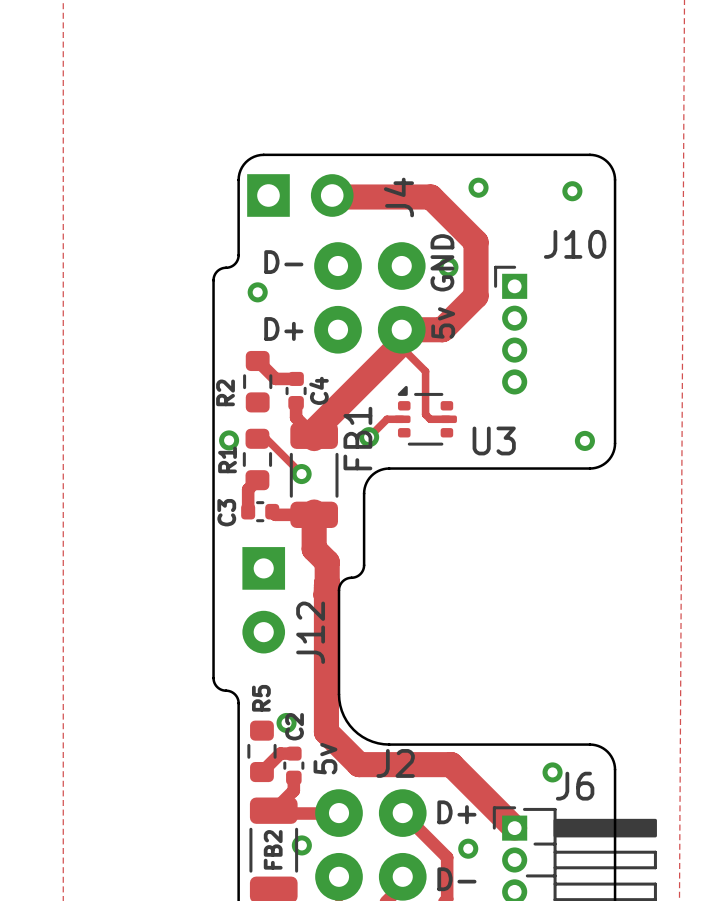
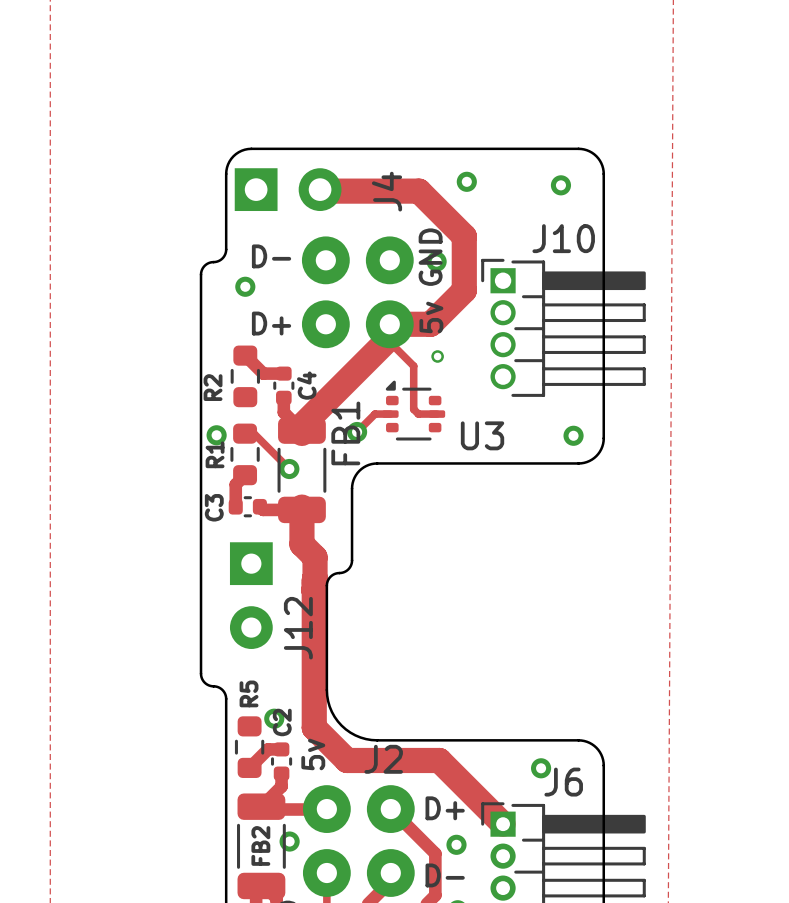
J10 footprint: [494, 265, 528, 395] -> [481, 258, 646, 397]
via: none -> (437, 356)

